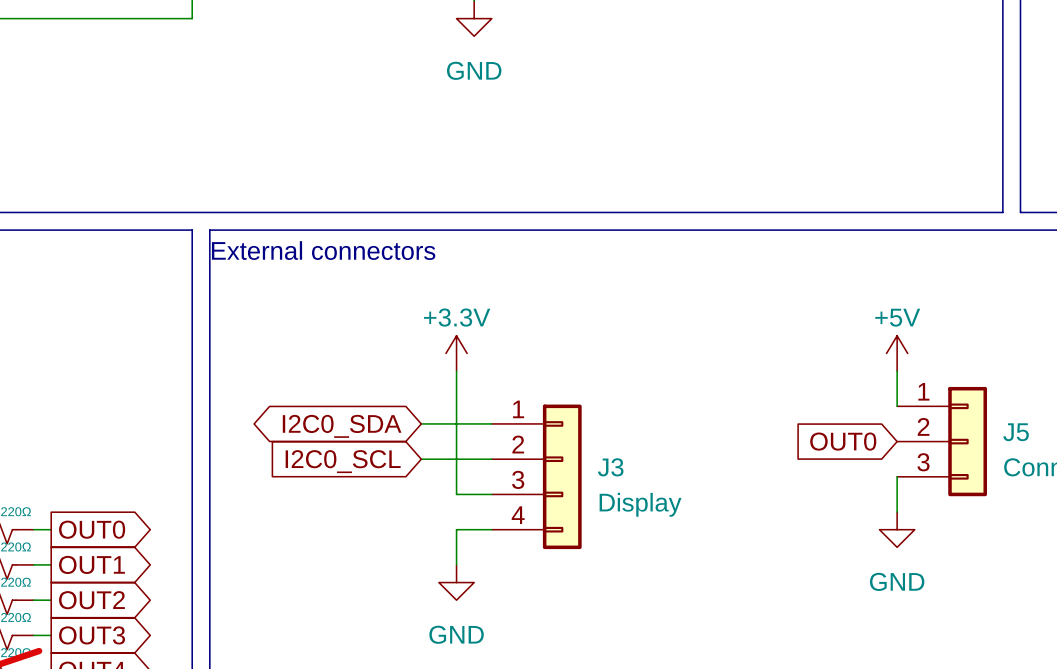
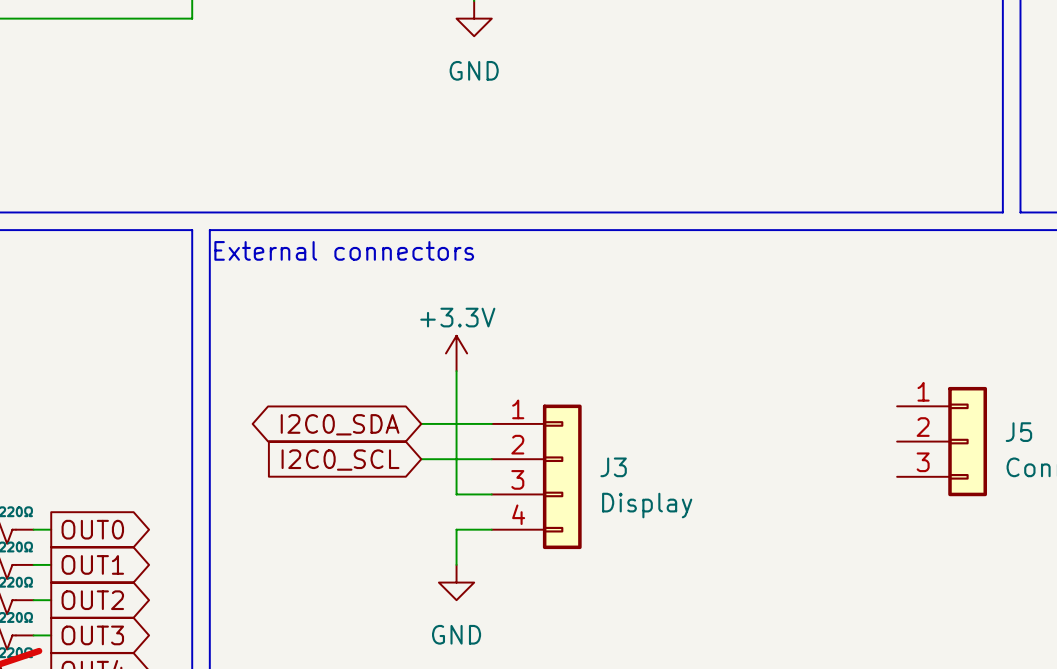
power symbol: +5V (897, 353) -> none
wire: (897, 371) (897, 406) -> none
global label: OUT0 (843, 441) -> none
wire: (897, 476) (897, 512) -> none
power symbol: GND (897, 529) -> none

